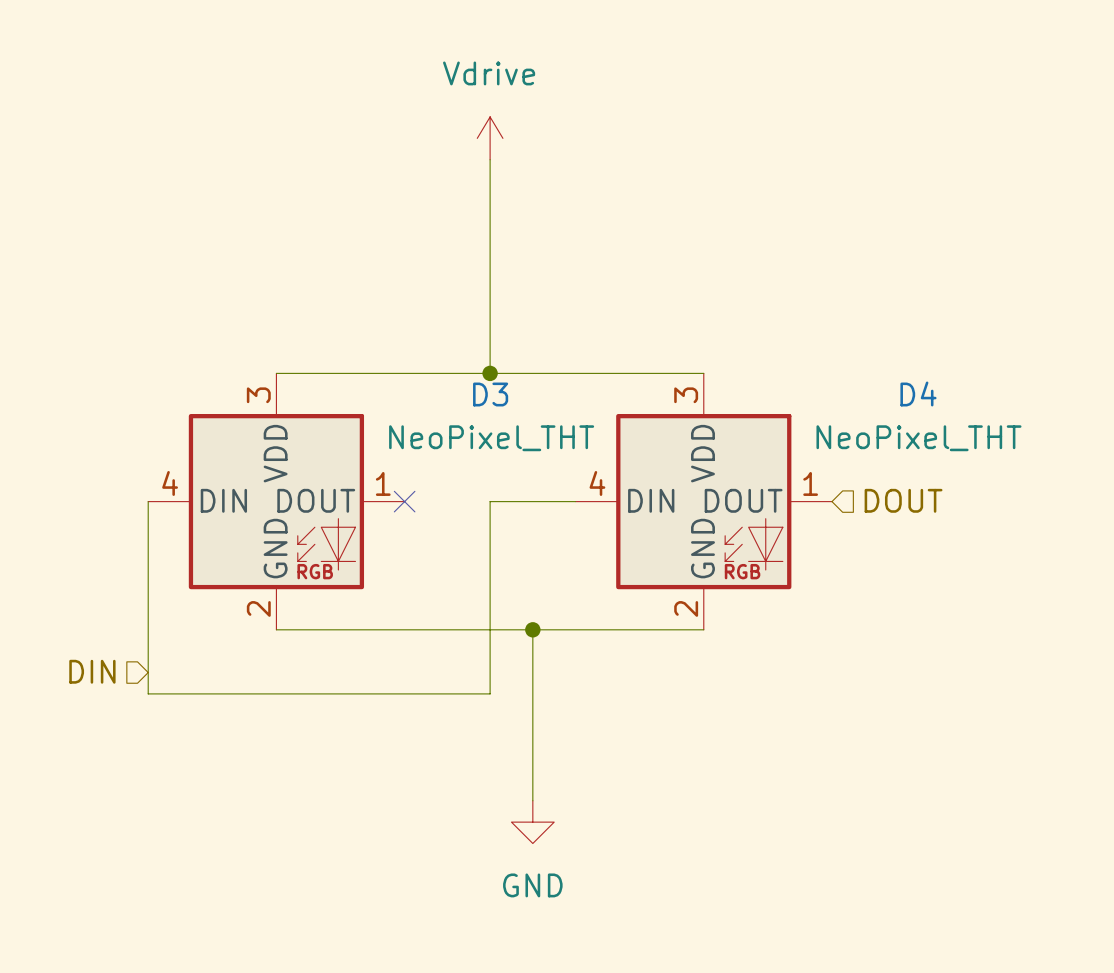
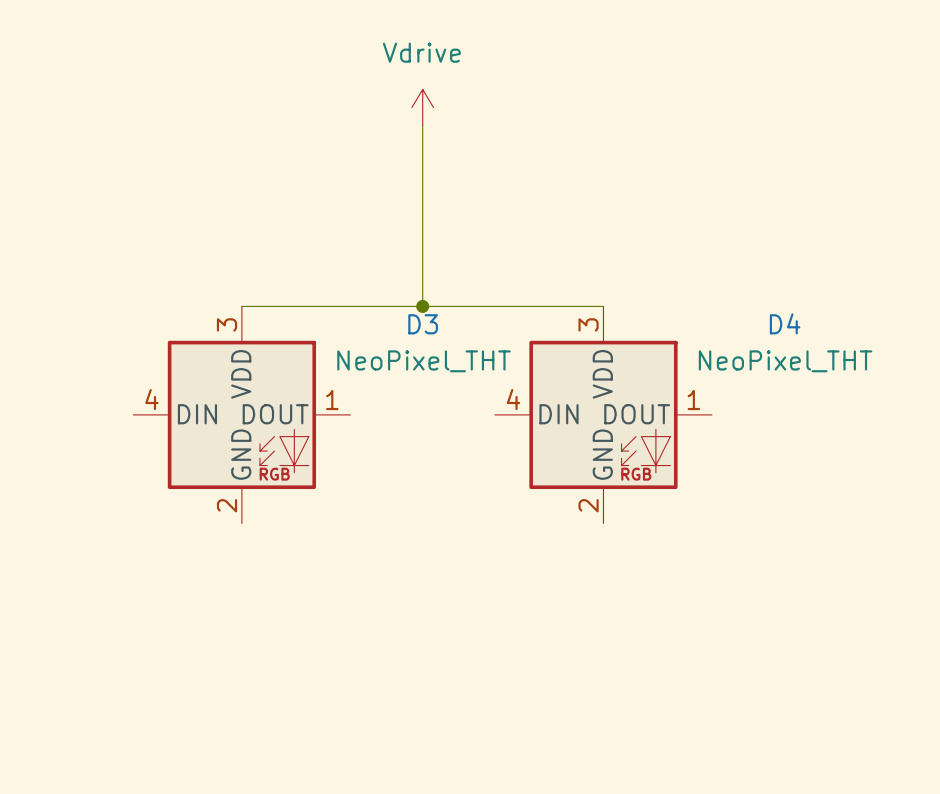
hierarchical label: DOUT (903, 500) -> none
wire: (148, 501) (148, 693) (490, 693) (490, 501) (575, 501) -> none
no-connect mark: (404, 501) -> none
wire: (276, 629) (703, 629) -> none
wire: (532, 629) (532, 800) -> none
junction: (532, 629) -> none
hierarchical label: DIN (92, 671) -> none
power symbol: GND (532, 822) -> none

